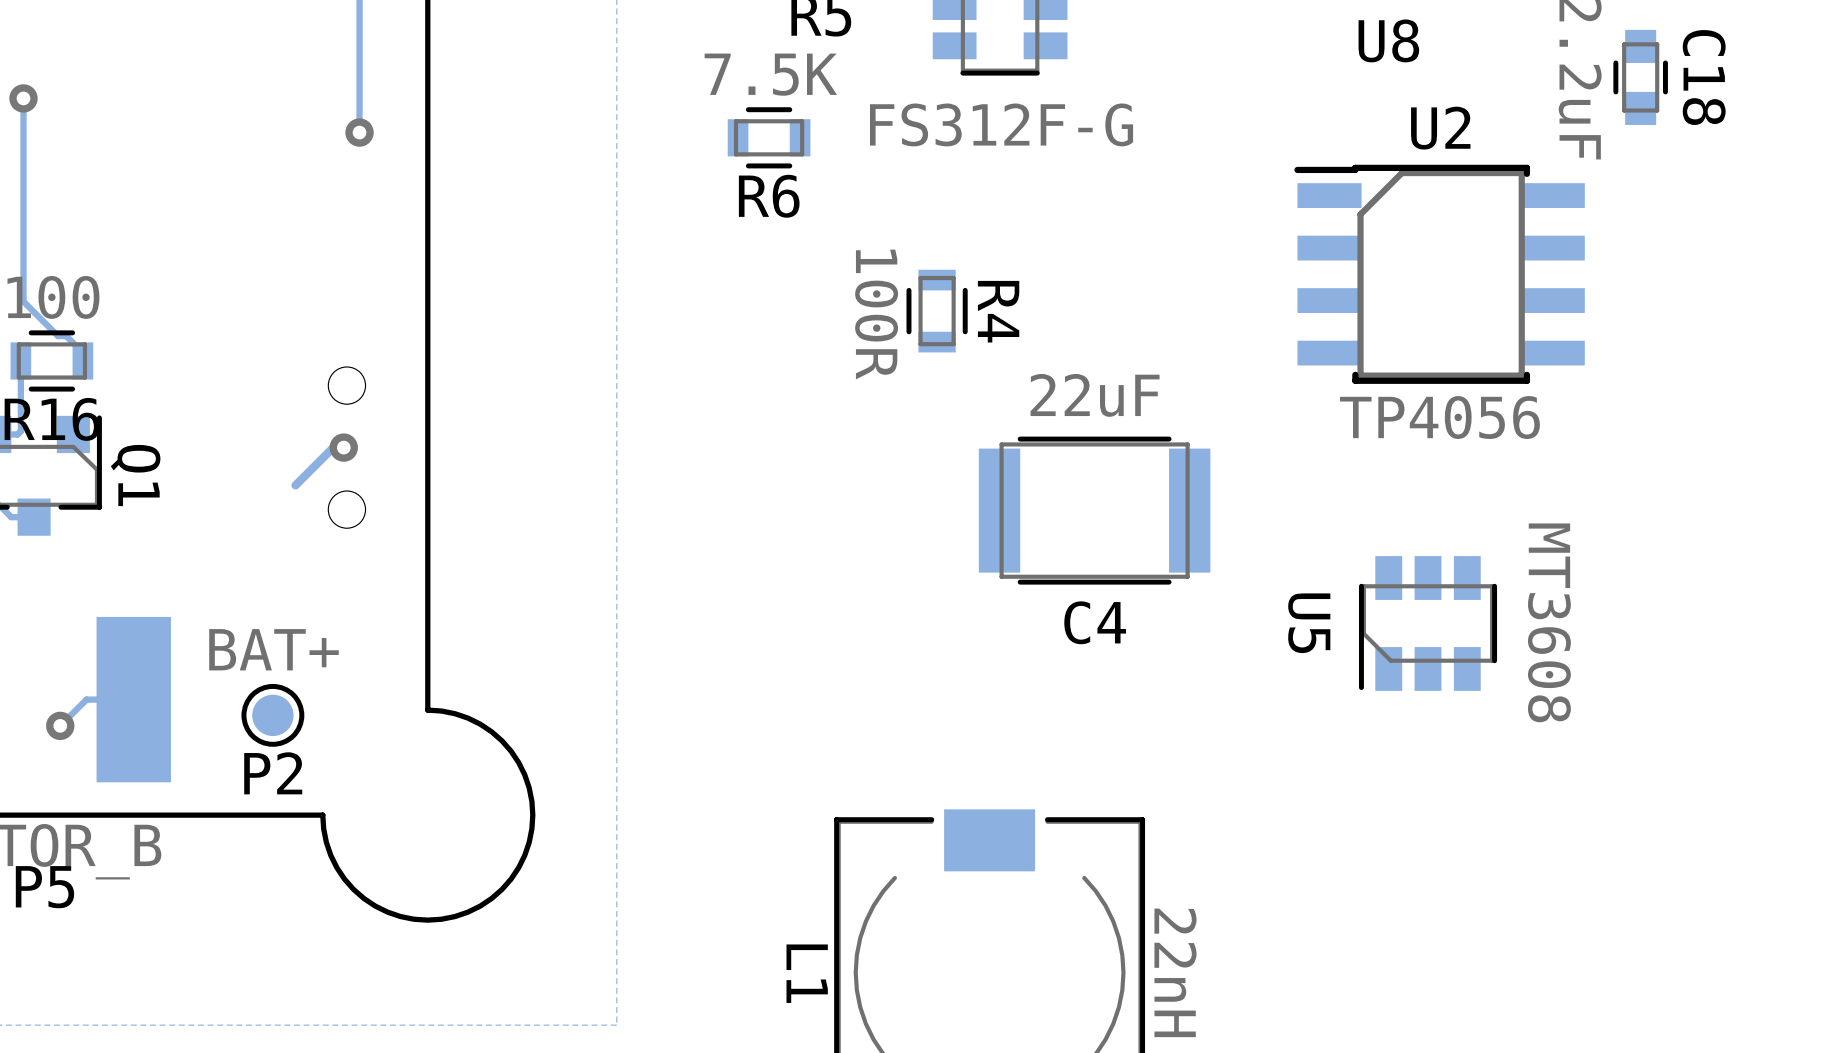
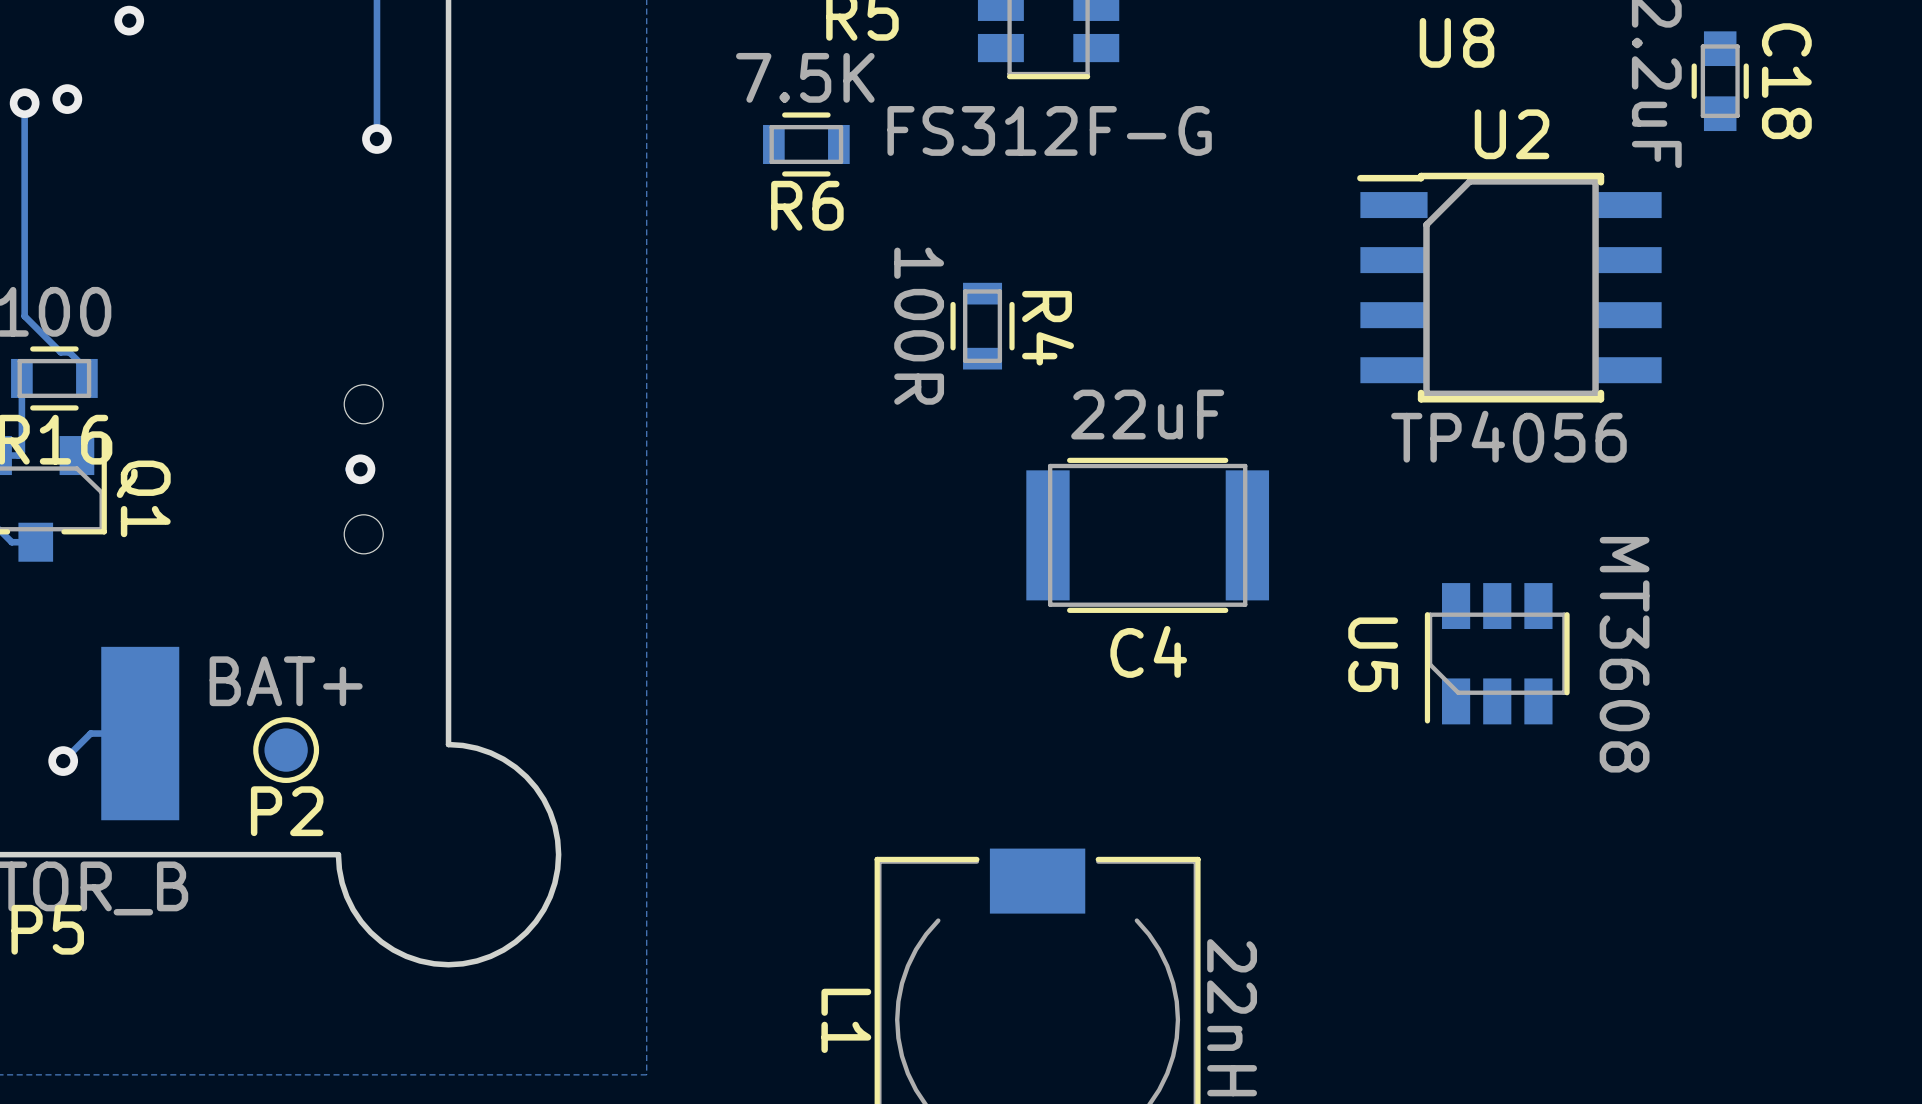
via: none -> (129, 20)
via: none -> (67, 99)
track: (333, 447) (295, 485) -> none

